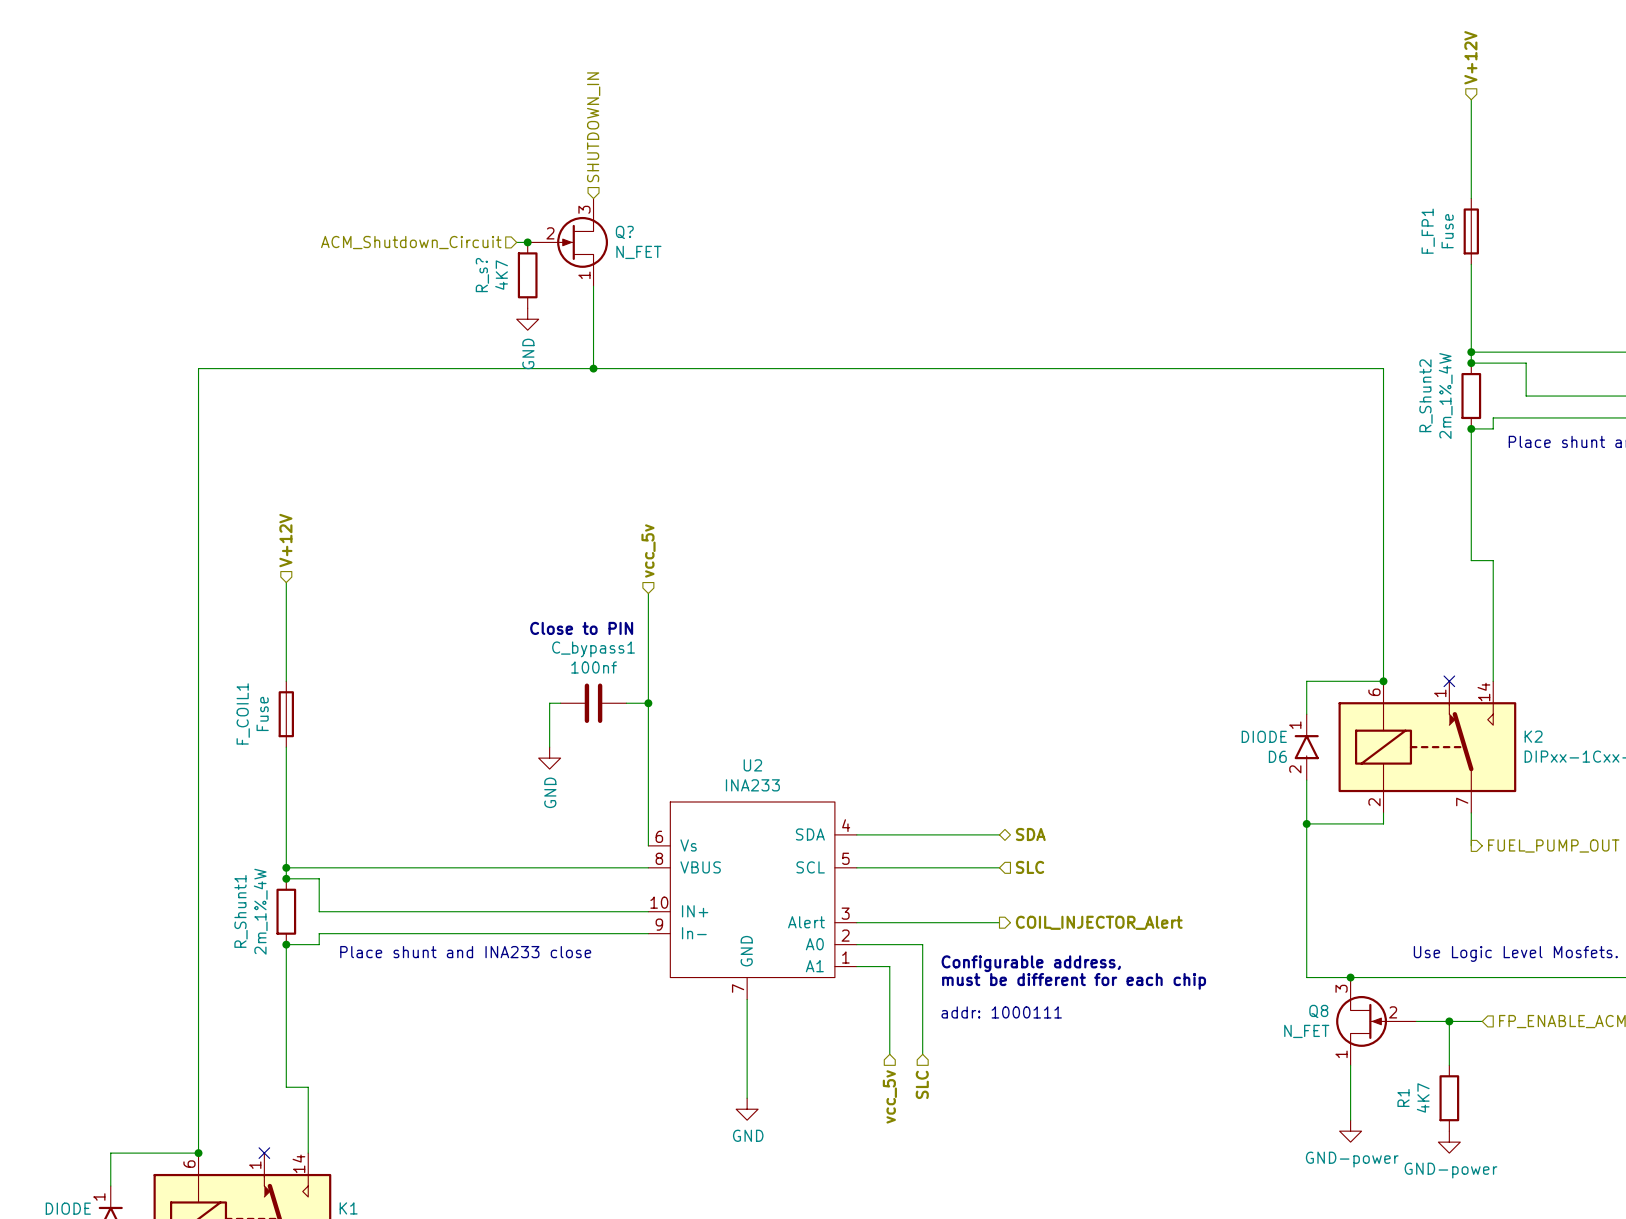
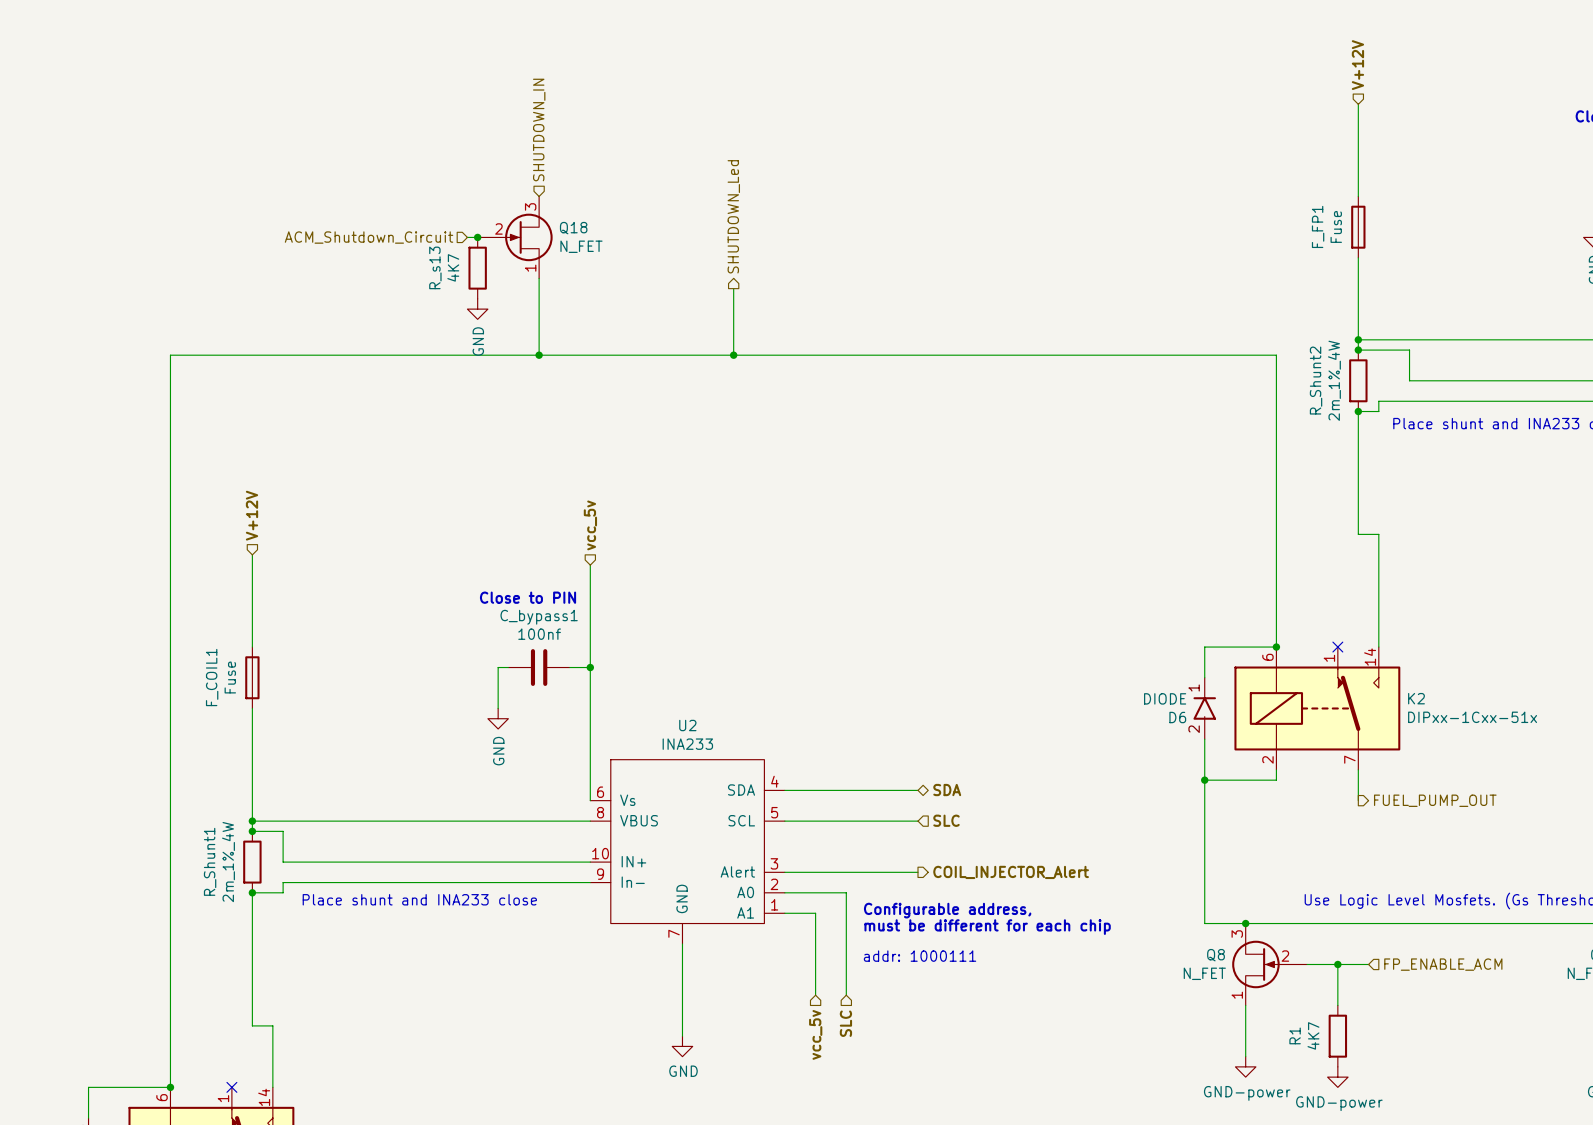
hierarchical label: none -> SHUTDOWN_Led (733, 216)
Q? name: Q? (624, 232) -> Q18 (573, 228)
R_s? name: R_s? (482, 275) -> R_s13 (435, 267)
wire: none -> (733, 288) (733, 355)
junction: none -> (733, 355)

